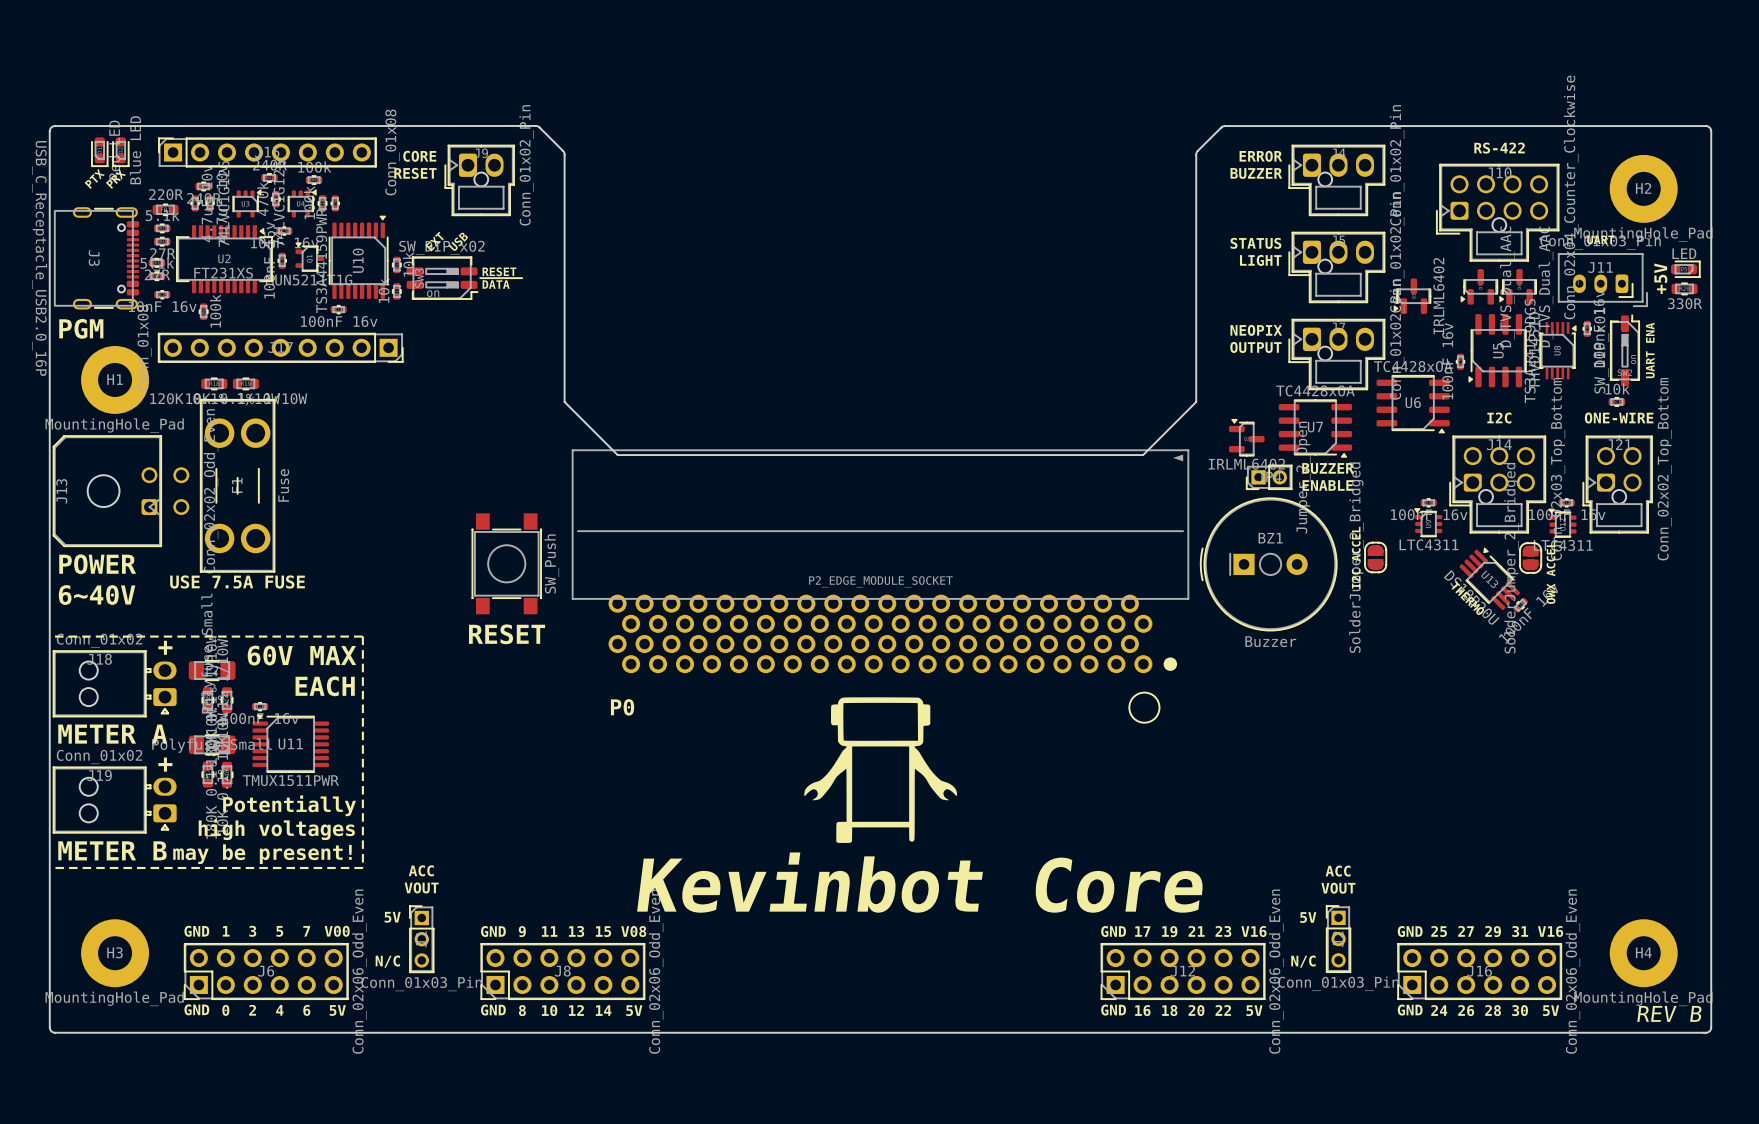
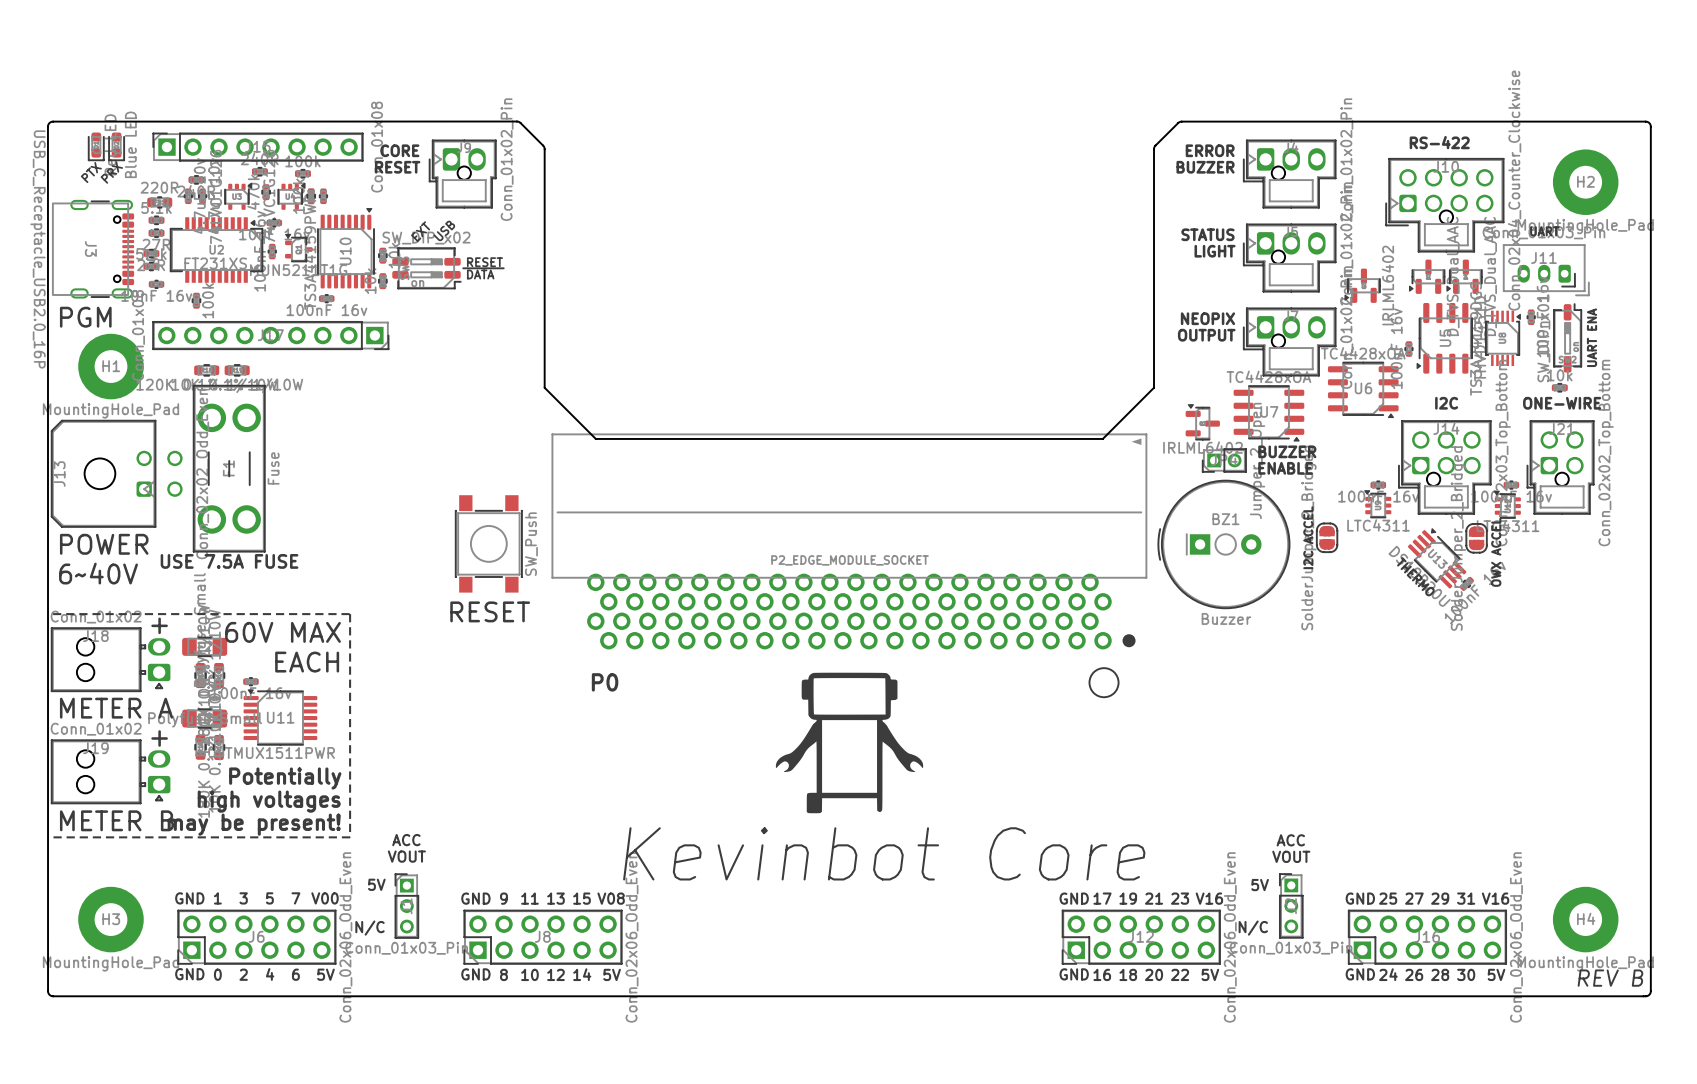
part: LED (1685, 269) -> none
text: +5V (1660, 278) -> none
part: 330R (1684, 288) -> none

